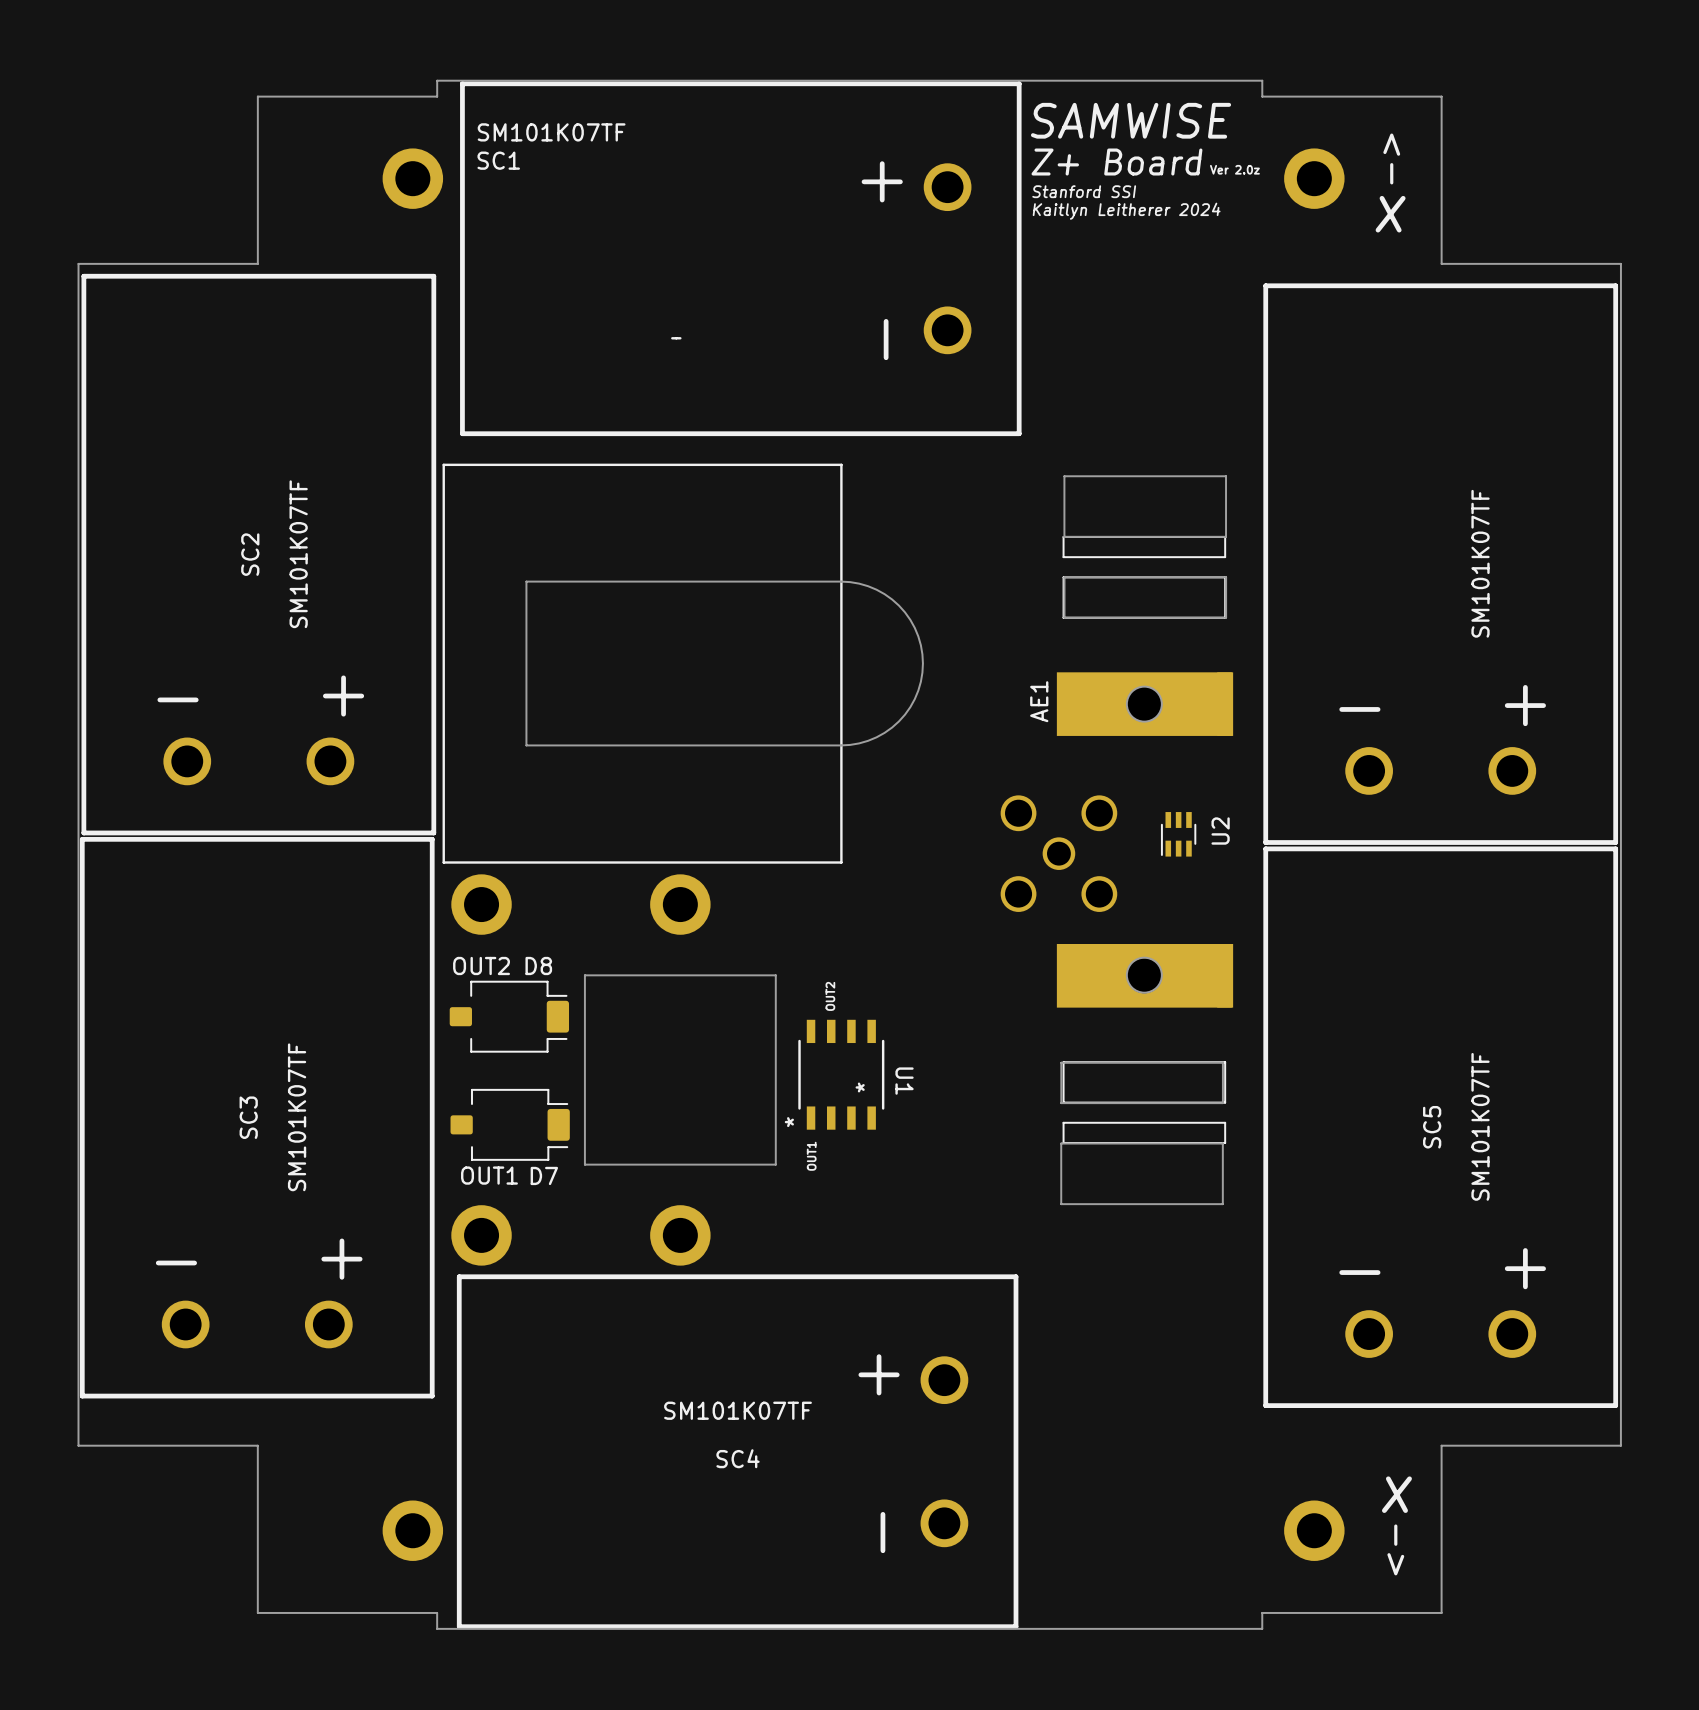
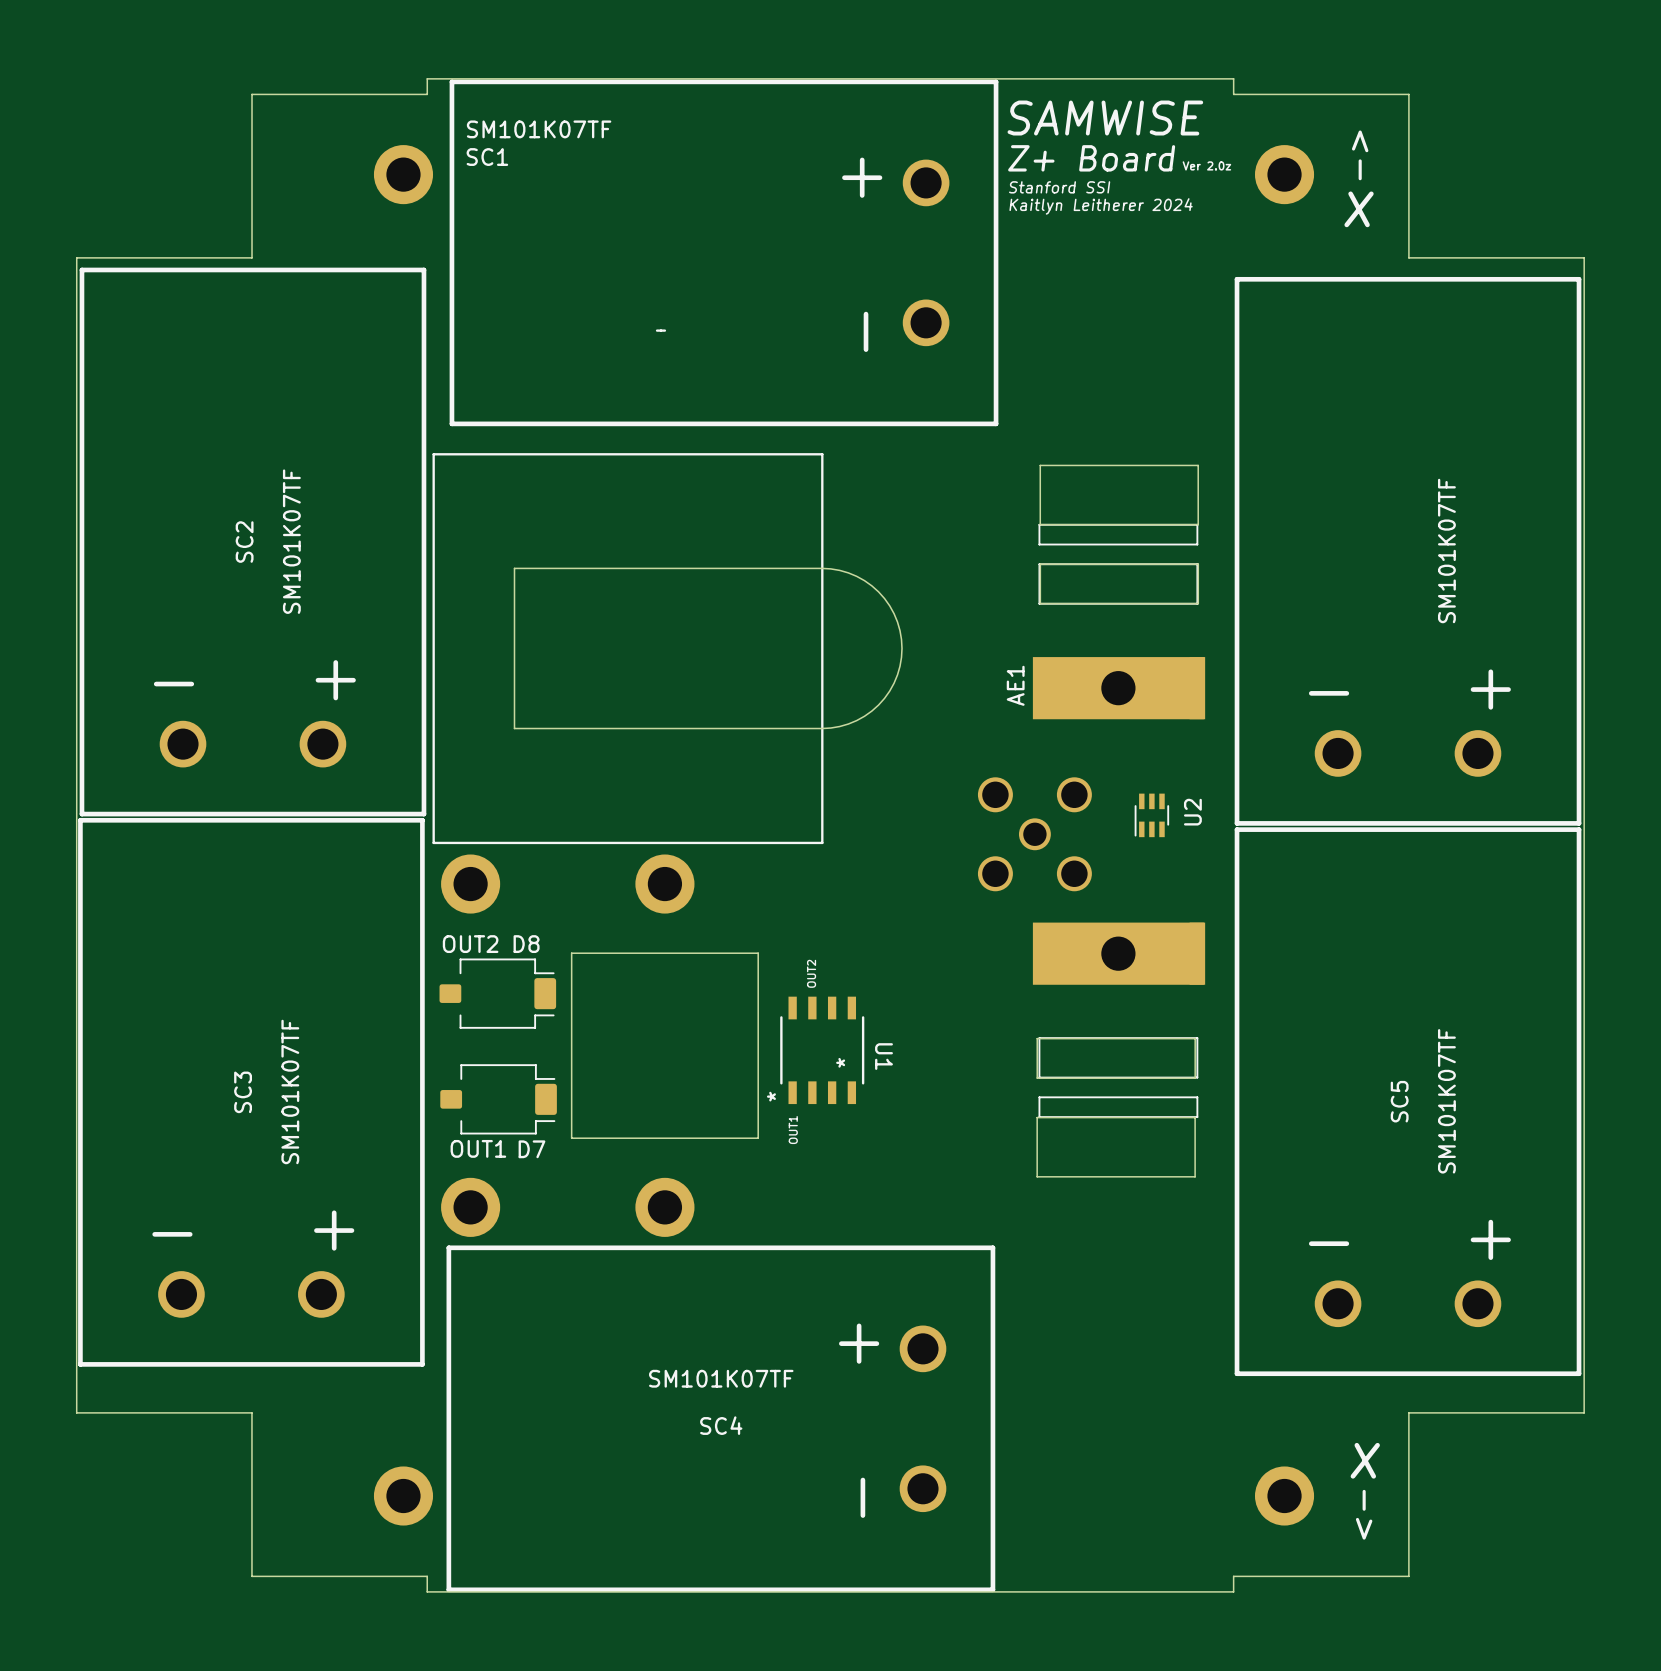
AE1 footprint: [1056, 536, 1234, 1144] -> [1032, 523, 1206, 1119]

